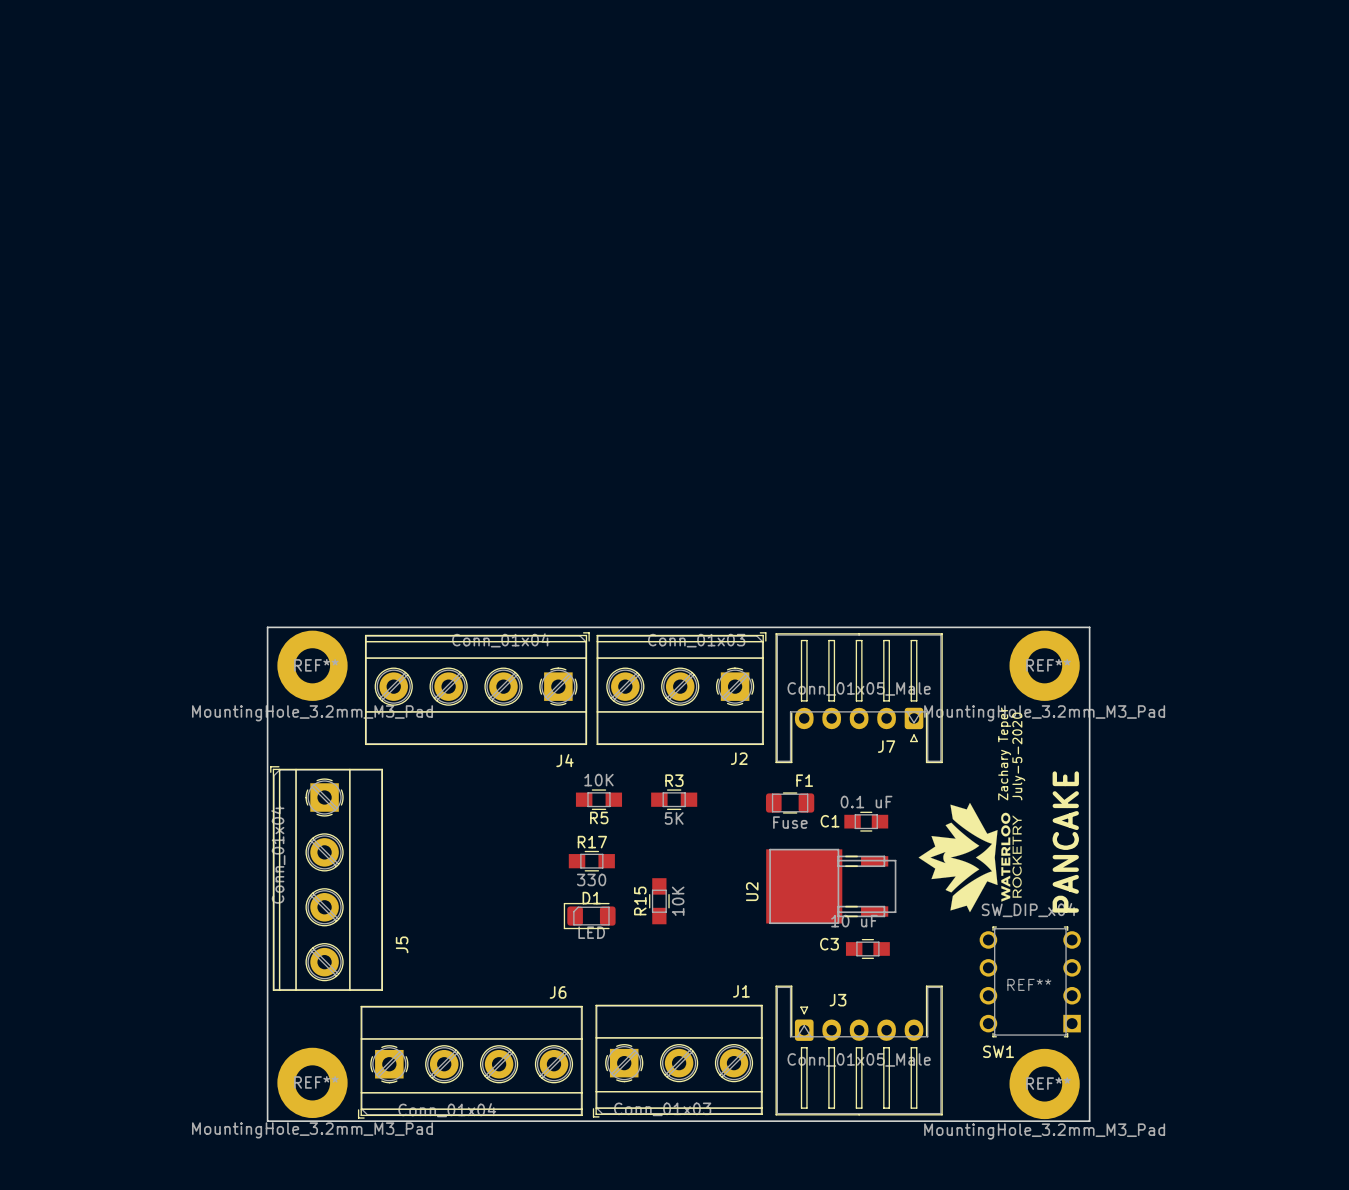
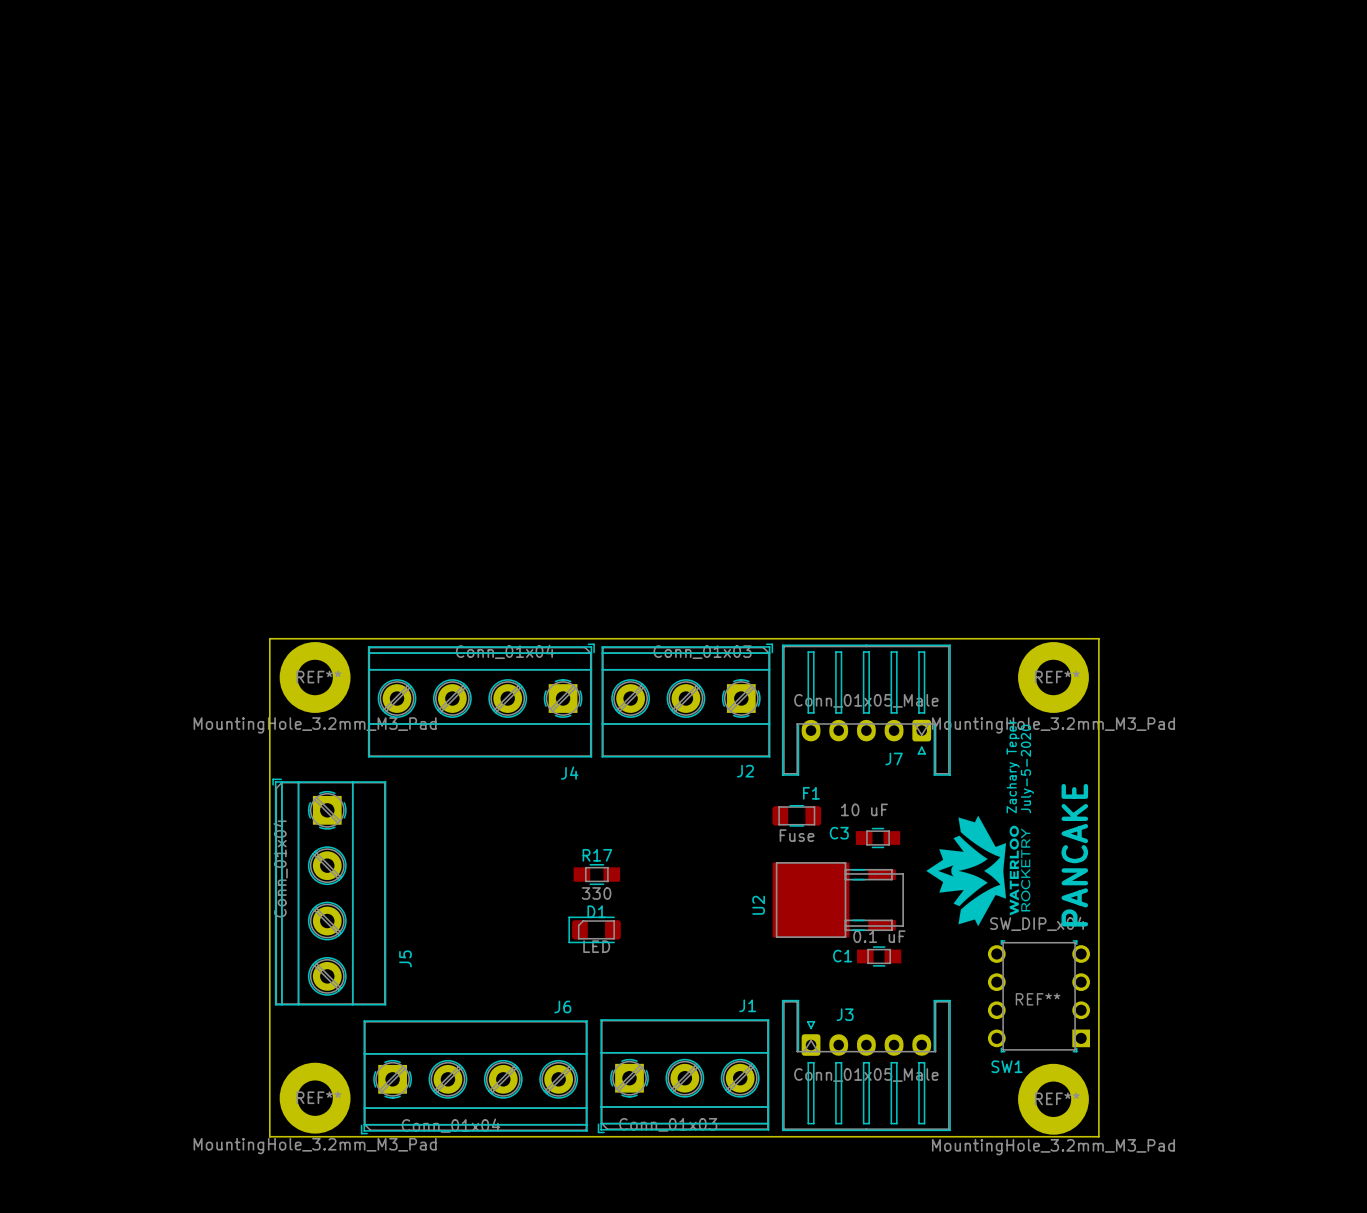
R5: 10K (598, 799) -> none
R3: 5K (674, 799) -> none
C1 position: (866, 821) -> (879, 956)
R15: 10K (659, 901) -> none
C3 position: (867, 948) -> (878, 838)

